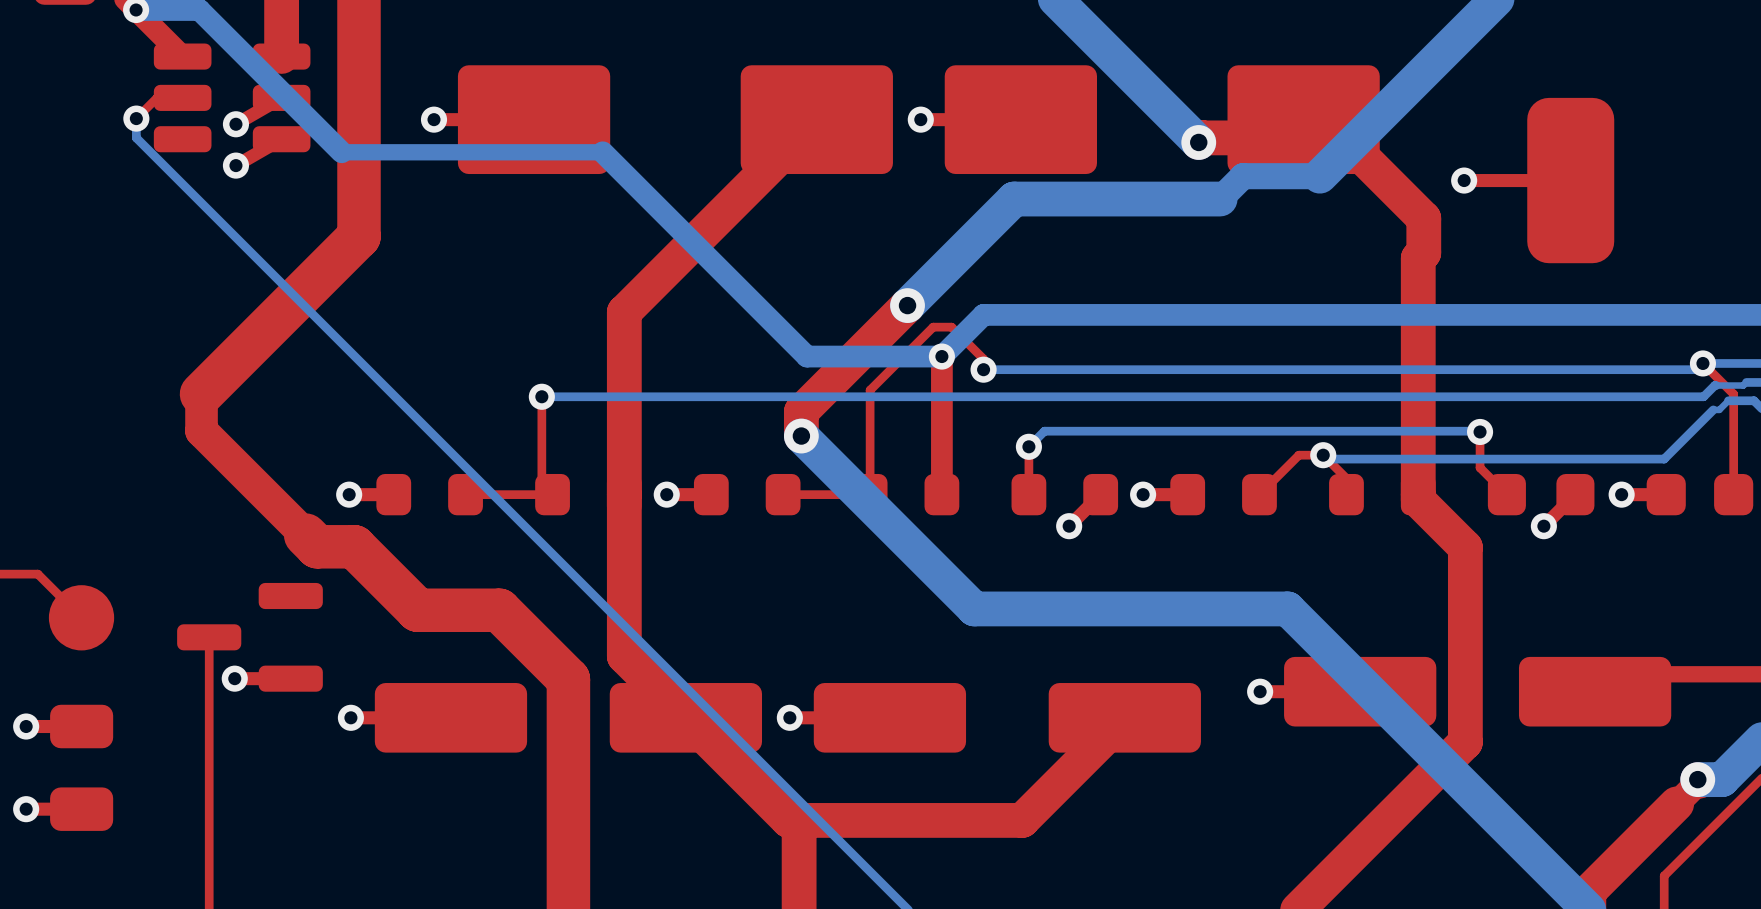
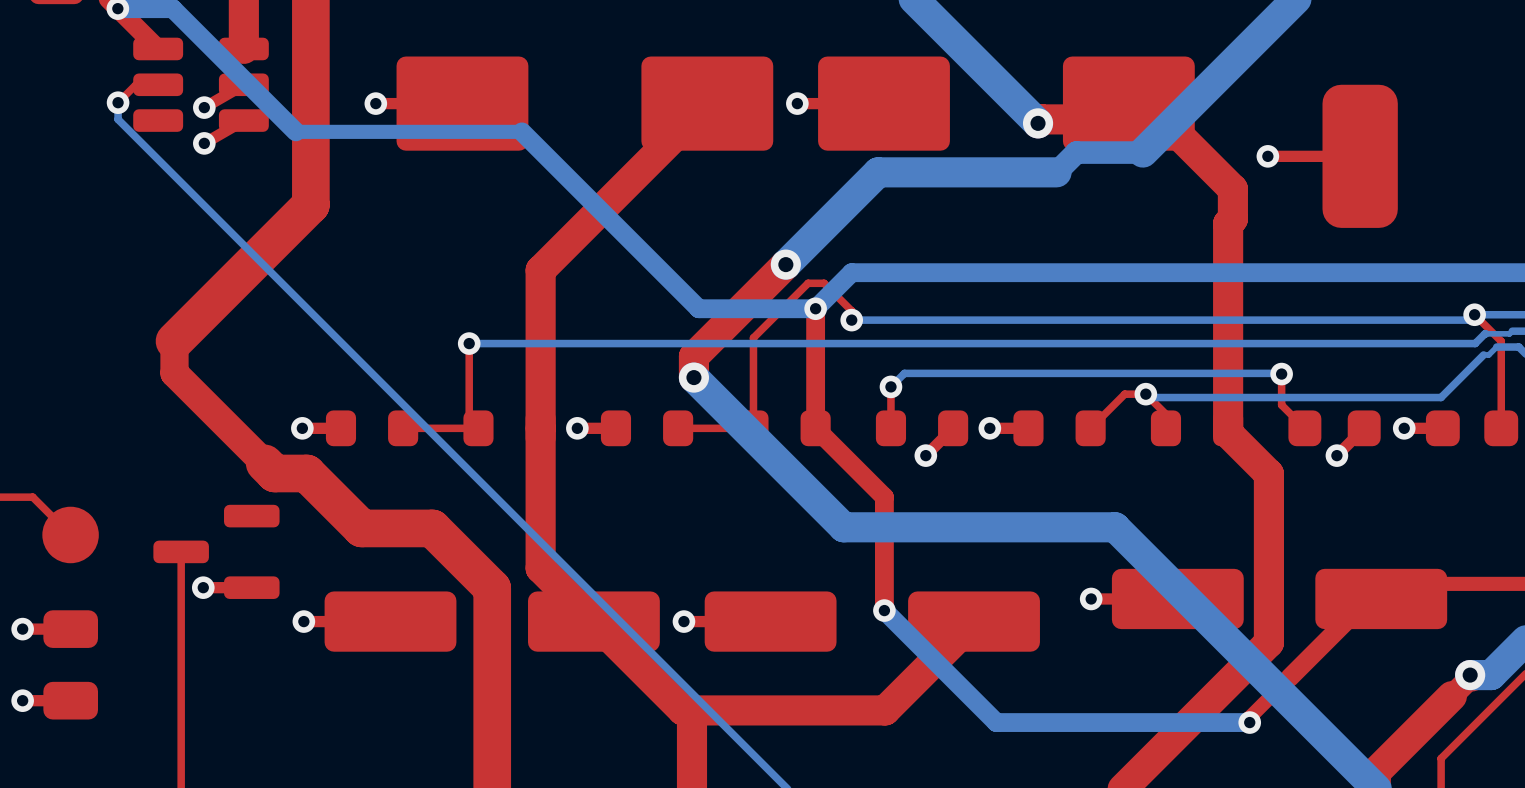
top track: none -> (815, 428) (884, 497) (884, 610)
top track: none -> (1381, 598) (1368, 598) (1249, 717) (1249, 722)
bottom track: none -> (884, 610) (996, 722) (1249, 722)
via: none -> (884, 610)
via: none -> (1249, 722)

